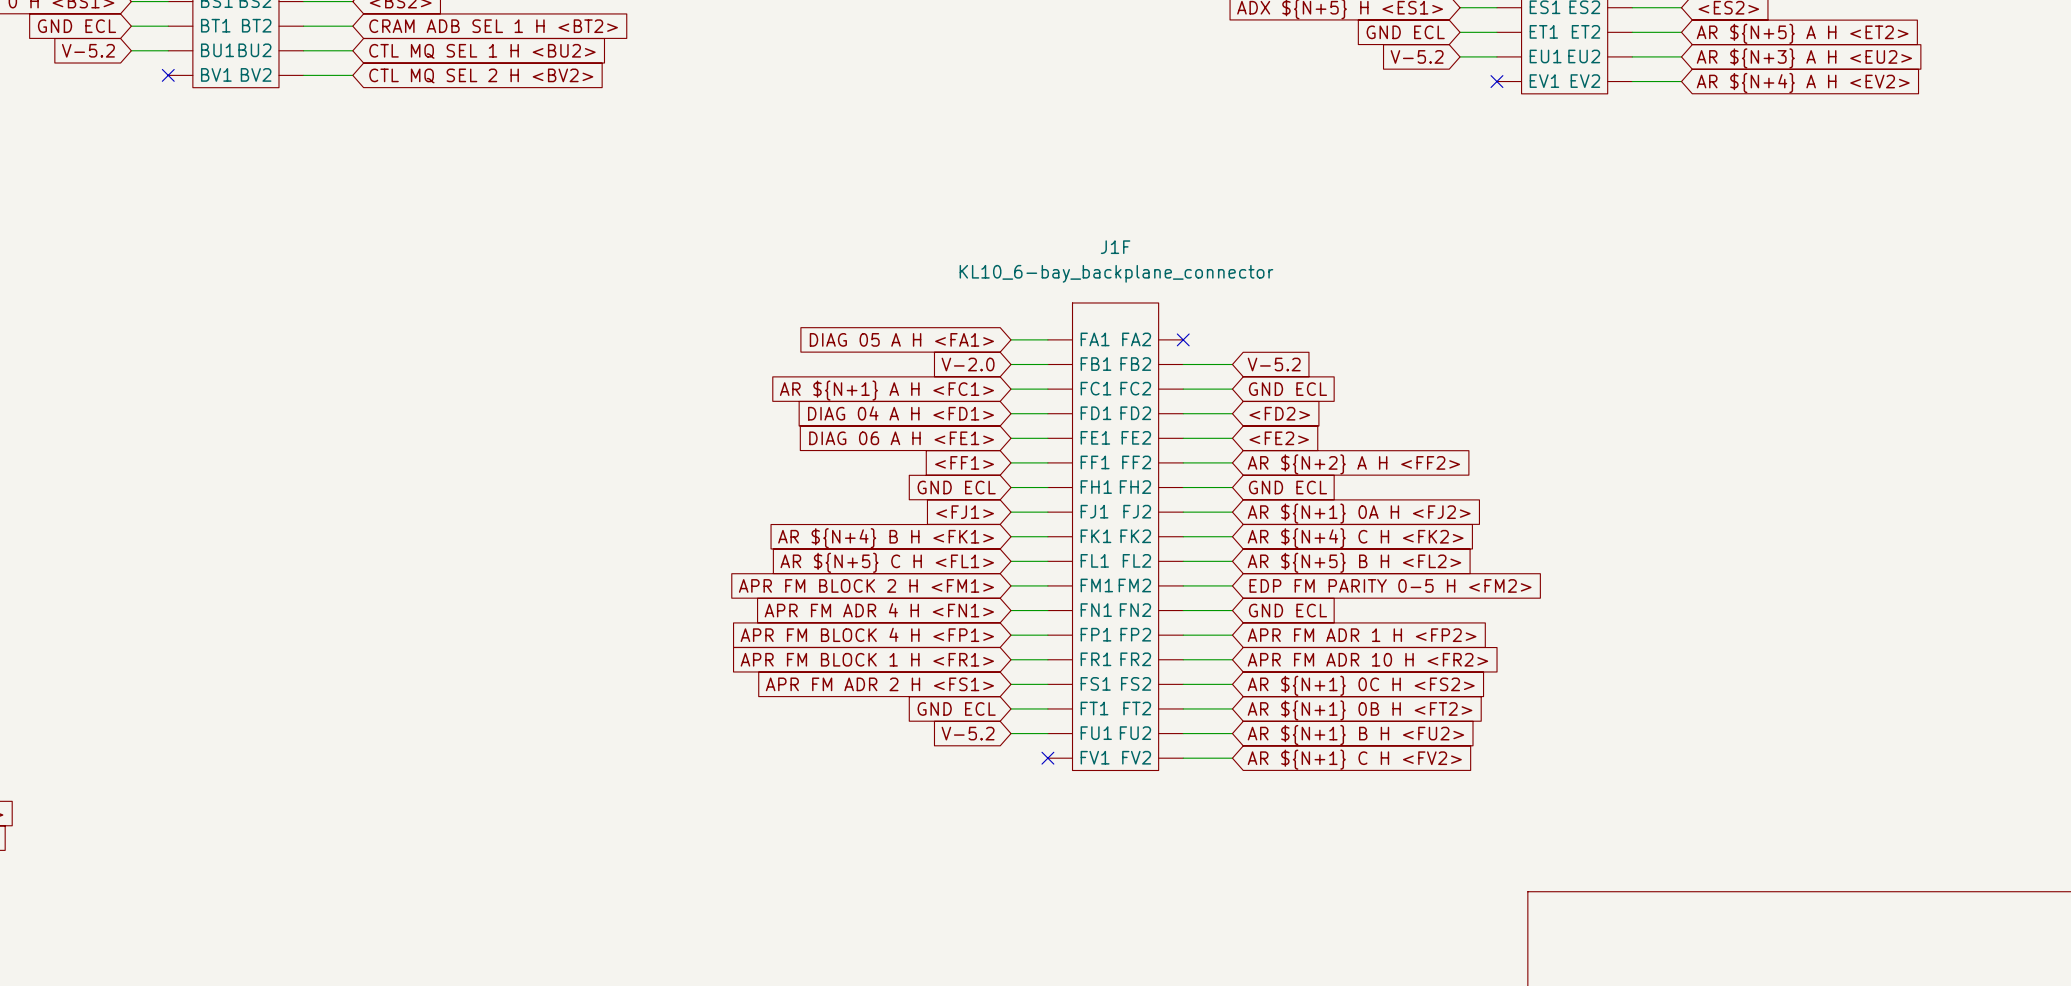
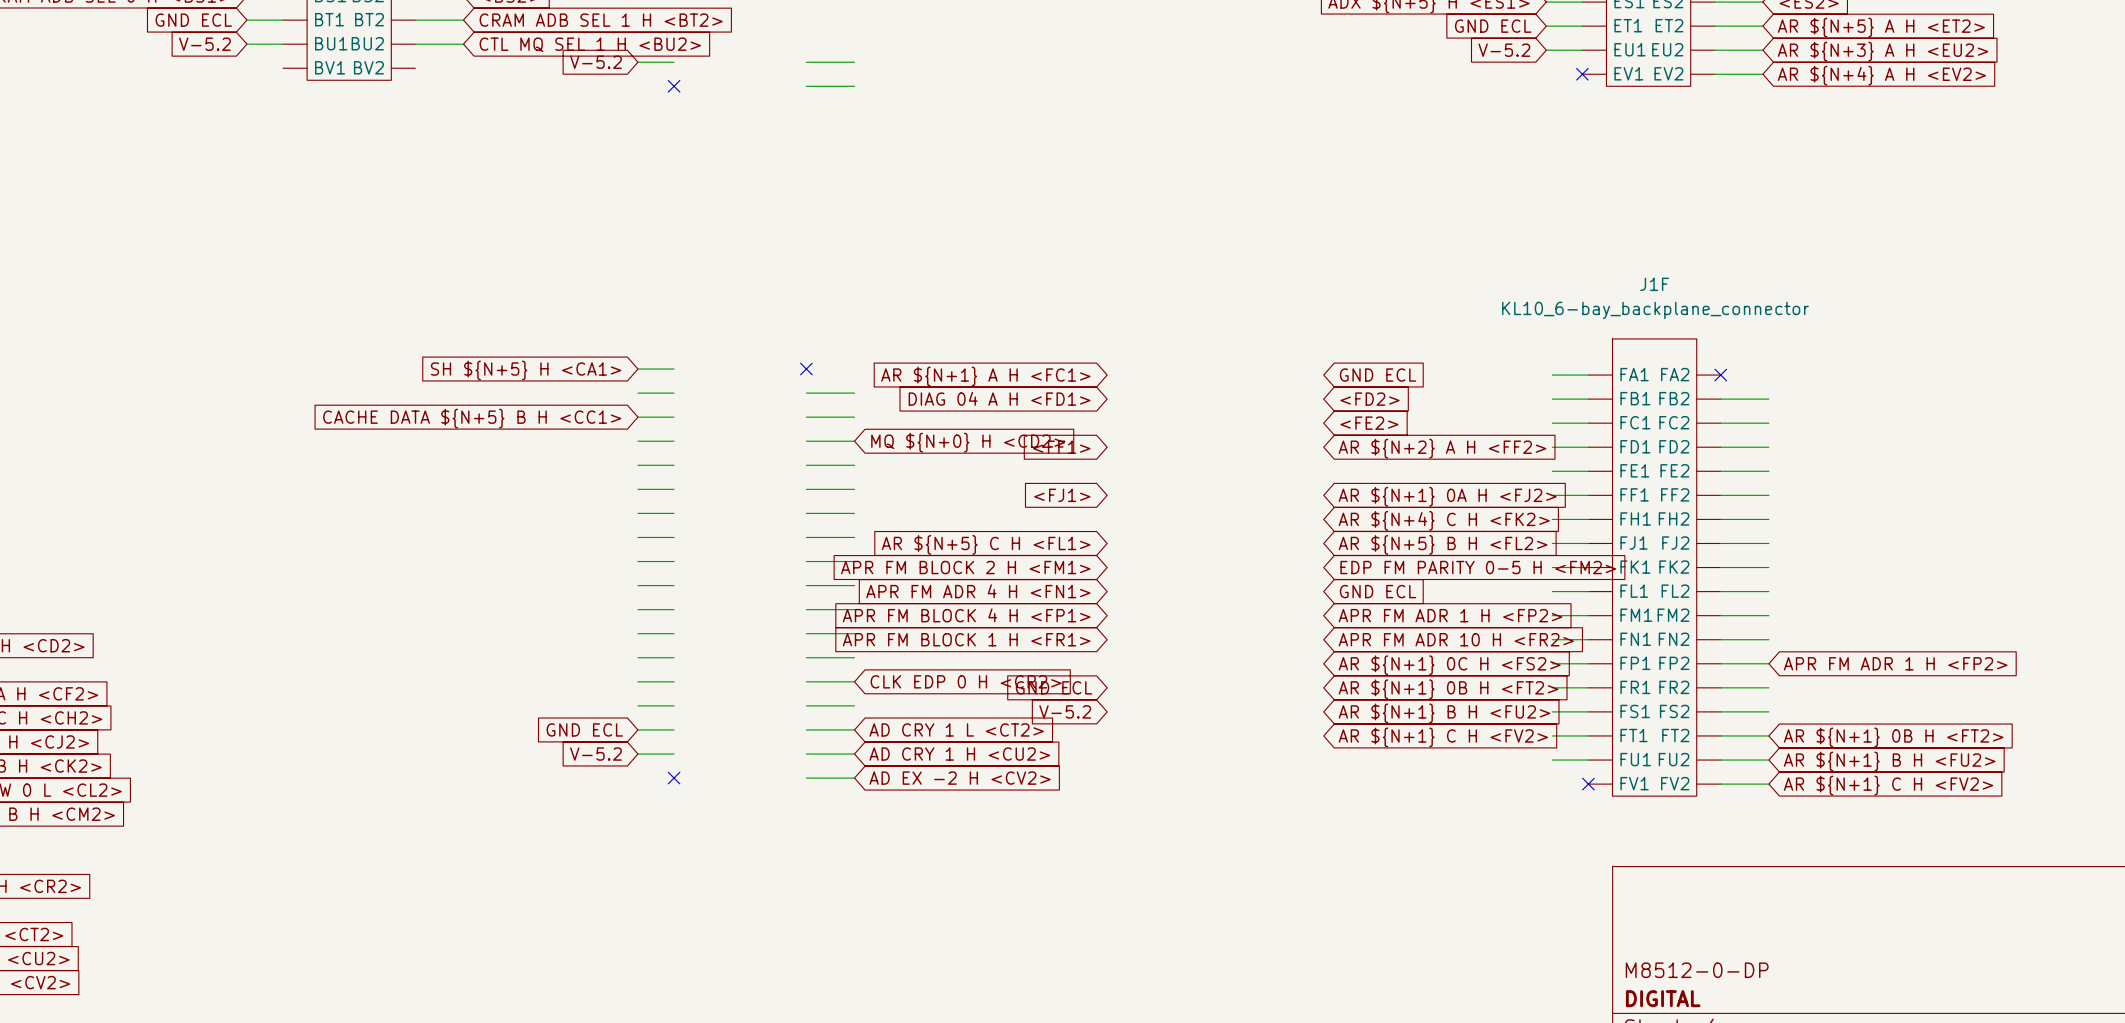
global label: none -> V-5.2 (595, 62)
wire: none -> (637, 62) (674, 62)
wire: none -> (806, 62) (854, 62)
no-connect mark: (168, 75) -> none
wire: (303, 75) (352, 75) -> none
global label: CTL MQ SEL 2 H <BV2> (481, 75) -> none
no-connect mark: none -> (674, 86)
wire: none -> (806, 86) (854, 86)
global label: DIAG 05 A H <FA1> (901, 339) -> none
wire: (1011, 339) (1047, 339) -> none
no-connect mark: (1183, 339) -> none
global label: V-2.0 (968, 364) -> none
wire: (1011, 364) (1047, 364) -> none
wire: (1183, 364) (1232, 364) -> none
global label: V-5.2 (1274, 364) -> none
wire: none -> (637, 369) (674, 369)
no-connect mark: none -> (806, 369)
global label: none -> SH ${N+5} H <CA1> (526, 370)
wire: (1011, 389) (1047, 389) -> none
wire: (1183, 389) (1232, 389) -> none
wire: none -> (1552, 375) (1588, 375)
no-connect mark: none -> (1720, 375)
wire: none -> (637, 393) (674, 393)
wire: none -> (806, 393) (854, 393)
wire: (1011, 413) (1047, 413) -> none
wire: (1183, 413) (1232, 413) -> none
wire: none -> (1552, 399) (1588, 399)
wire: none -> (1720, 399) (1768, 399)
wire: none -> (637, 417) (674, 417)
wire: none -> (806, 417) (854, 417)
global label: none -> CACHE DATA ${N+5} B H <CC1> (472, 418)
global label: DIAG 06 A H <FE1> (901, 438) -> none
wire: (1011, 438) (1047, 438) -> none
wire: (1183, 438) (1232, 438) -> none
wire: none -> (1552, 423) (1588, 423)
wire: none -> (1720, 423) (1768, 423)
wire: none -> (637, 441) (674, 441)
wire: none -> (806, 441) (854, 441)
global label: none -> MQ ${N+0} H <CD2> (968, 442)
wire: (1011, 462) (1047, 462) -> none
wire: (1183, 462) (1232, 462) -> none
wire: none -> (1552, 447) (1588, 447)
wire: none -> (1720, 447) (1768, 447)
wire: none -> (637, 465) (674, 465)
wire: none -> (806, 465) (854, 465)
global label: GND ECL (956, 487) -> none
wire: (1011, 487) (1047, 487) -> none
wire: (1183, 487) (1232, 487) -> none
global label: GND ECL (1287, 487) -> none
wire: none -> (1552, 471) (1588, 471)
wire: none -> (1720, 471) (1768, 471)
wire: none -> (637, 489) (674, 489)
wire: none -> (806, 489) (854, 489)
wire: (1011, 512) (1047, 512) -> none
wire: (1183, 512) (1232, 512) -> none
wire: none -> (1552, 495) (1588, 495)
wire: none -> (1720, 495) (1768, 495)
wire: none -> (637, 513) (674, 513)
wire: none -> (806, 513) (854, 513)
wire: (1011, 536) (1047, 536) -> none
J1F position: (1115, 536) -> (1654, 567)
wire: (1183, 536) (1232, 536) -> none
wire: none -> (1552, 519) (1588, 519)
wire: none -> (1720, 519) (1768, 519)
global label: AR ${N+4} B H <FK1> (886, 538) -> none
wire: none -> (637, 537) (674, 537)
wire: none -> (806, 537) (854, 537)
wire: (1011, 561) (1047, 561) -> none
wire: (1183, 561) (1232, 561) -> none
wire: none -> (1552, 543) (1588, 543)
wire: none -> (1720, 543) (1768, 543)
wire: none -> (637, 561) (674, 561)
wire: none -> (806, 561) (854, 561)
wire: (1011, 585) (1047, 585) -> none
wire: (1183, 585) (1232, 585) -> none
wire: none -> (1552, 567) (1588, 567)
wire: none -> (1720, 567) (1768, 567)
wire: none -> (637, 585) (674, 585)
wire: none -> (806, 585) (854, 585)
wire: (1011, 610) (1047, 610) -> none
wire: (1183, 610) (1232, 610) -> none
wire: none -> (1552, 591) (1588, 591)
wire: none -> (1720, 591) (1768, 591)
wire: none -> (637, 609) (674, 609)
wire: none -> (806, 609) (854, 609)
wire: (1011, 635) (1047, 635) -> none
wire: (1183, 635) (1232, 635) -> none
wire: none -> (1552, 615) (1588, 615)
wire: none -> (1720, 615) (1768, 615)
wire: none -> (637, 633) (674, 633)
wire: none -> (806, 633) (854, 633)
wire: (1011, 659) (1047, 659) -> none
wire: (1183, 659) (1232, 659) -> none
wire: none -> (1552, 639) (1588, 639)
wire: none -> (1720, 639) (1768, 639)
wire: none -> (637, 657) (674, 657)
wire: none -> (806, 657) (854, 657)
global label: APR FM ADR 2 H <FS1> (879, 684) -> none
wire: (1011, 684) (1047, 684) -> none
wire: (1183, 684) (1232, 684) -> none
wire: none -> (1552, 663) (1588, 663)
wire: none -> (1720, 663) (1768, 663)
global label: none -> APR FM ADR 1 H <FP2> (1895, 663)
wire: none -> (637, 681) (674, 681)
wire: none -> (806, 681) (854, 681)
global label: none -> CLK EDP 0 H <CR2> (966, 681)
wire: (1011, 708) (1047, 708) -> none
wire: (1183, 708) (1232, 708) -> none
wire: none -> (1552, 687) (1588, 687)
wire: none -> (1720, 687) (1768, 687)
wire: none -> (637, 705) (674, 705)
wire: none -> (806, 705) (854, 705)
wire: (1011, 733) (1047, 733) -> none
wire: (1183, 733) (1232, 733) -> none
wire: none -> (1552, 711) (1588, 711)
wire: none -> (1720, 711) (1768, 711)
global label: none -> GND ECL (584, 729)
wire: none -> (637, 729) (674, 729)
wire: none -> (806, 729) (854, 729)
global label: none -> AD CRY 1 L <CT2> (956, 729)
no-connect mark: (1047, 758) -> none
wire: (1183, 758) (1232, 758) -> none
wire: none -> (1552, 735) (1588, 735)
wire: none -> (1720, 735) (1768, 735)
global label: none -> AR ${N+1} 0B H <FT2> (1893, 737)
global label: none -> V-5.2 (595, 754)
wire: none -> (637, 754) (674, 754)
wire: none -> (806, 754) (854, 754)
global label: none -> AD CRY 1 H <CU2> (959, 754)
wire: none -> (1552, 760) (1588, 760)
wire: none -> (1720, 760) (1768, 760)
global label: none -> AR ${N+1} B H <FU2> (1889, 761)
no-connect mark: none -> (674, 778)
wire: none -> (806, 778) (854, 778)
global label: none -> AD EX -2 H <CV2> (960, 778)
no-connect mark: none -> (1588, 784)
wire: none -> (1720, 784) (1768, 784)
global label: none -> AR ${N+1} C H <FV2> (1888, 785)

